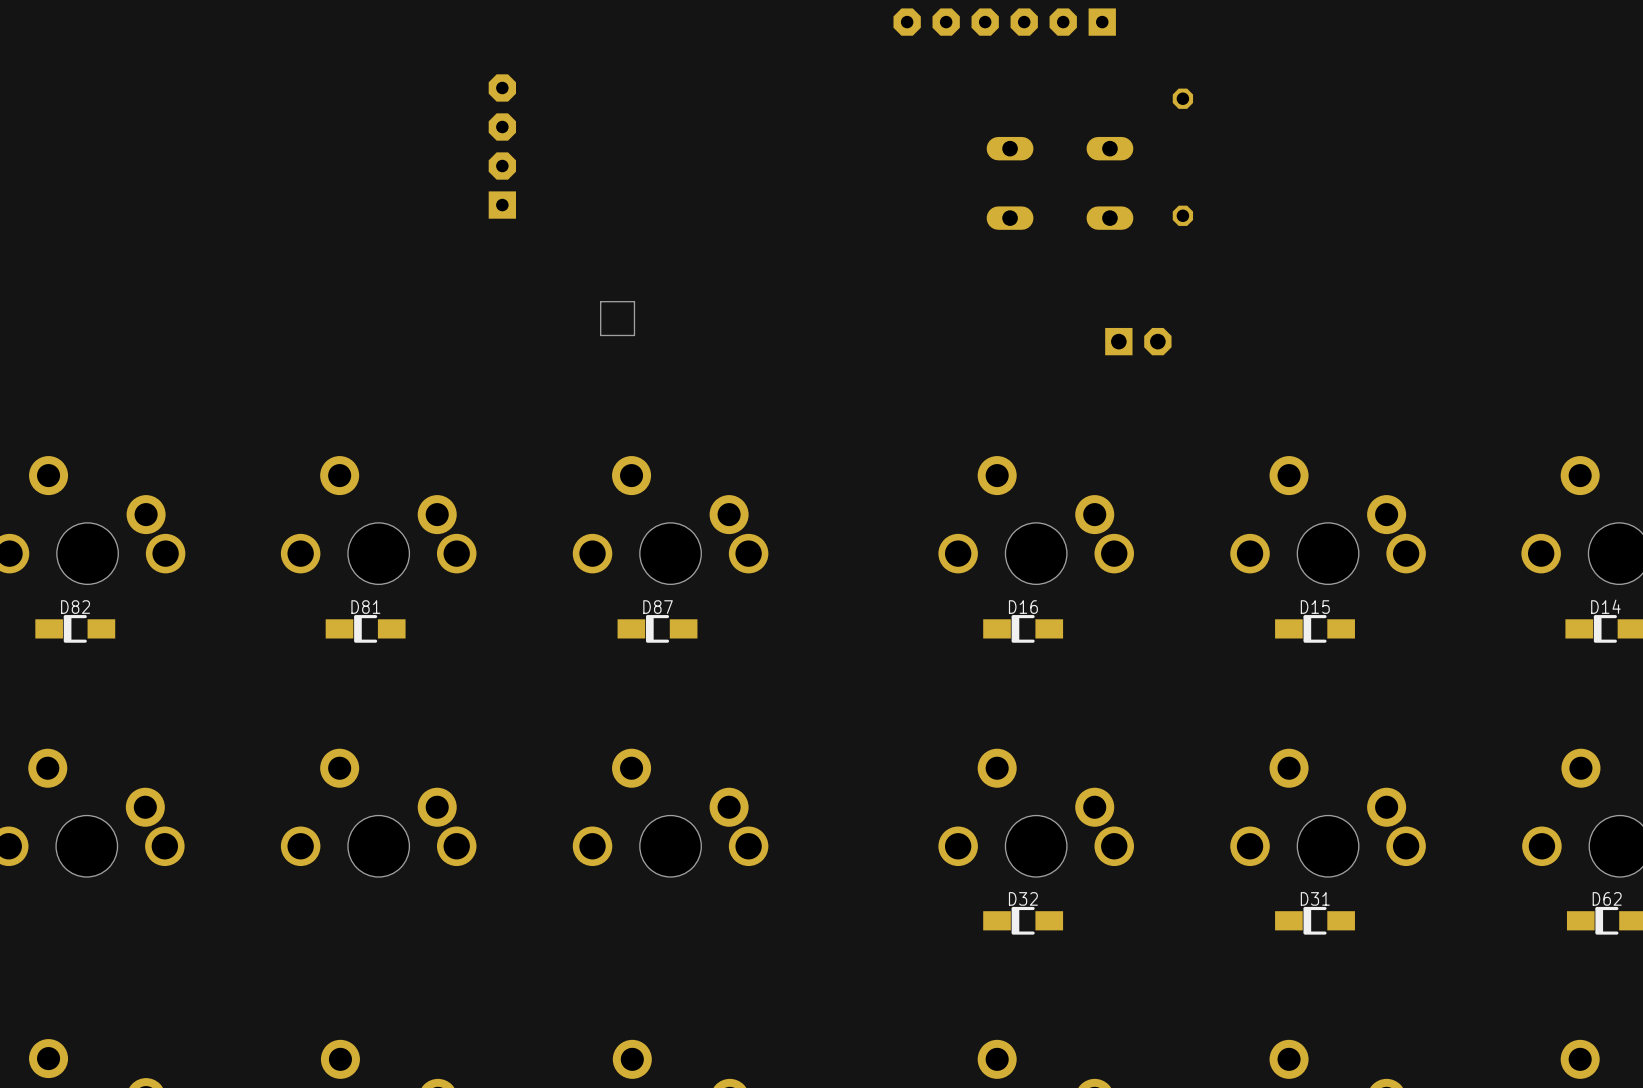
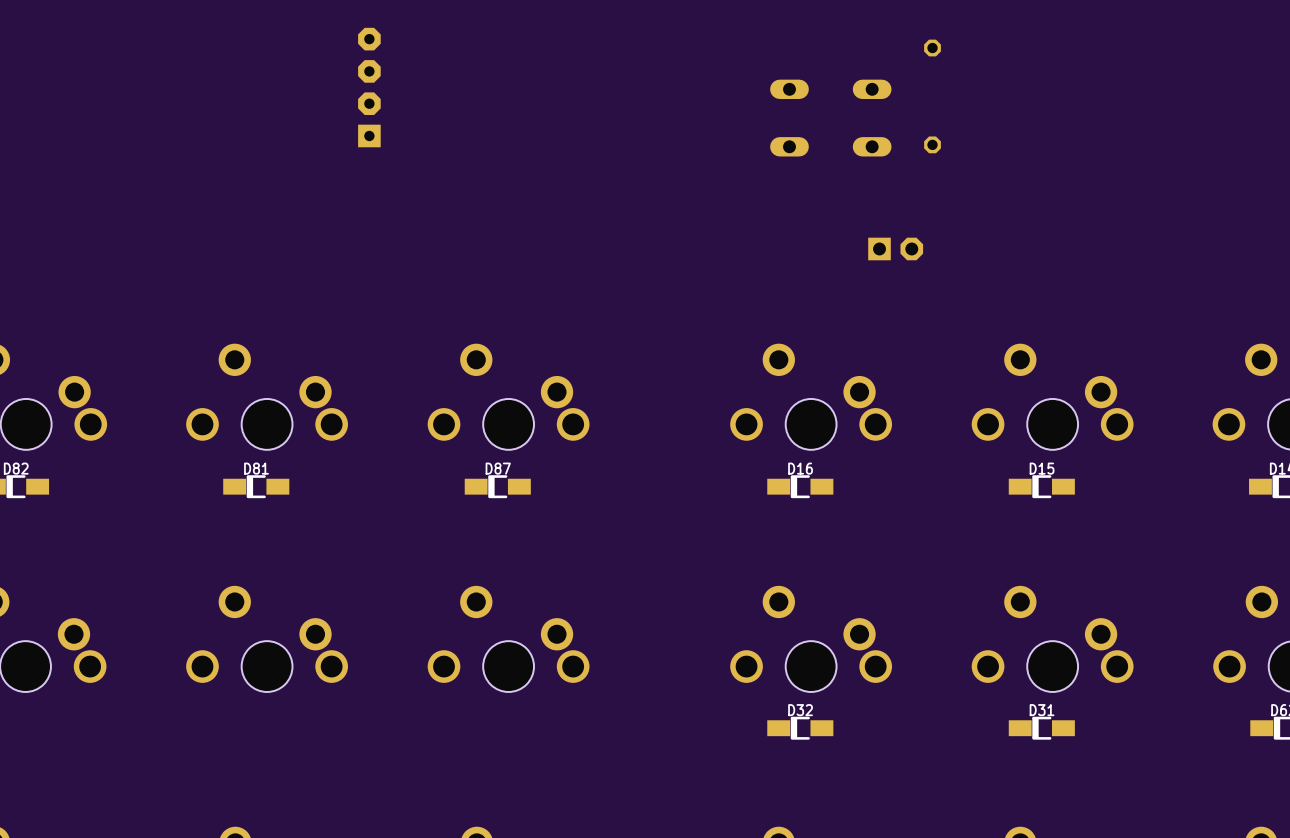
part: (617, 318) -> none

